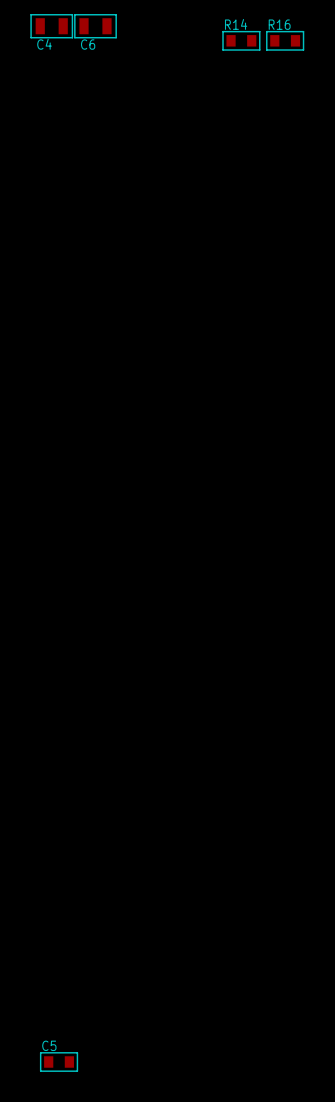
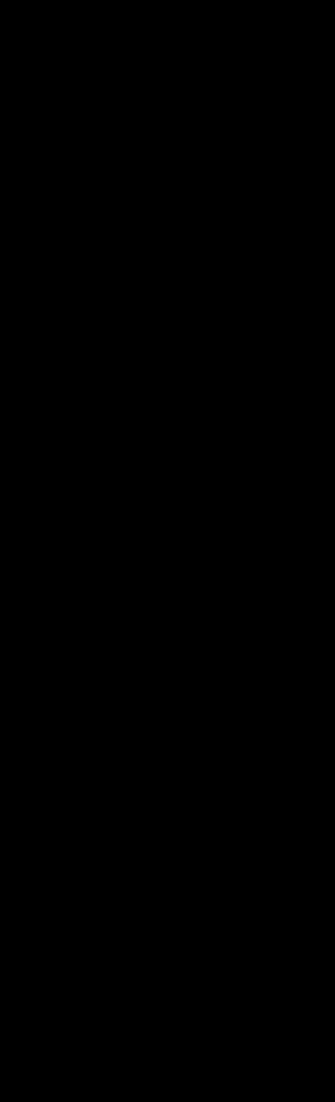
C4: (51, 26) -> none
C6: (95, 26) -> none
R14: (241, 40) -> none
R16: (285, 40) -> none
C5: (59, 1061) -> none

